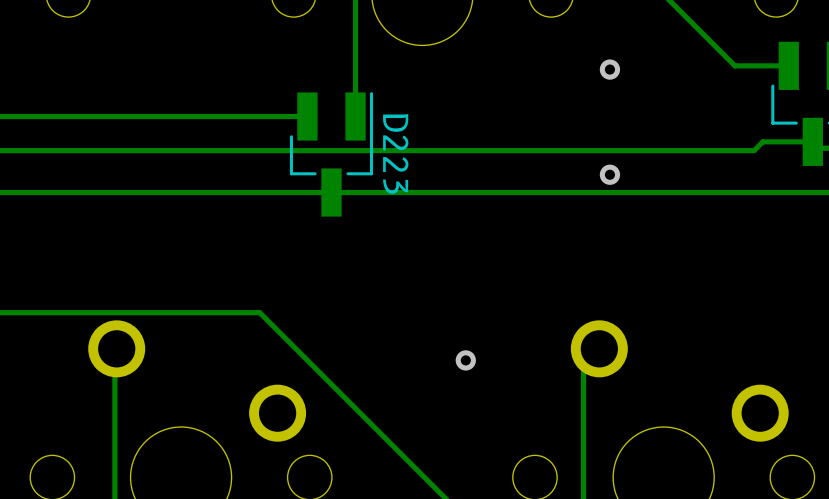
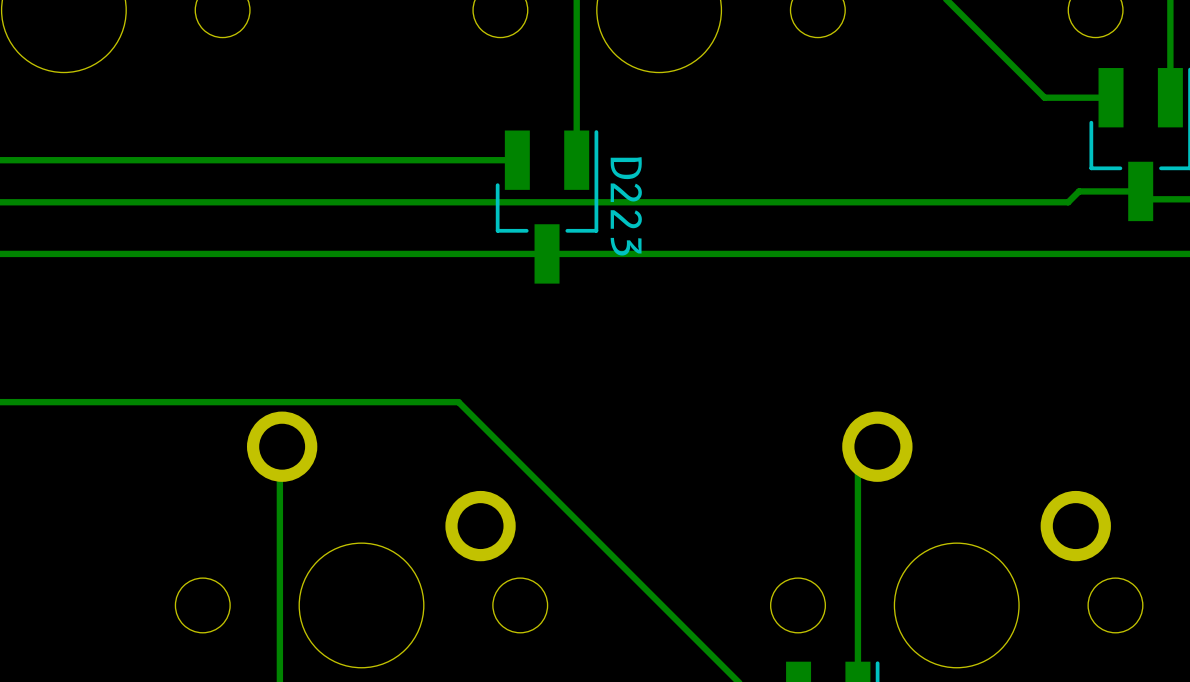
via: (609, 69) -> none
via: (609, 174) -> none
via: (465, 360) -> none

